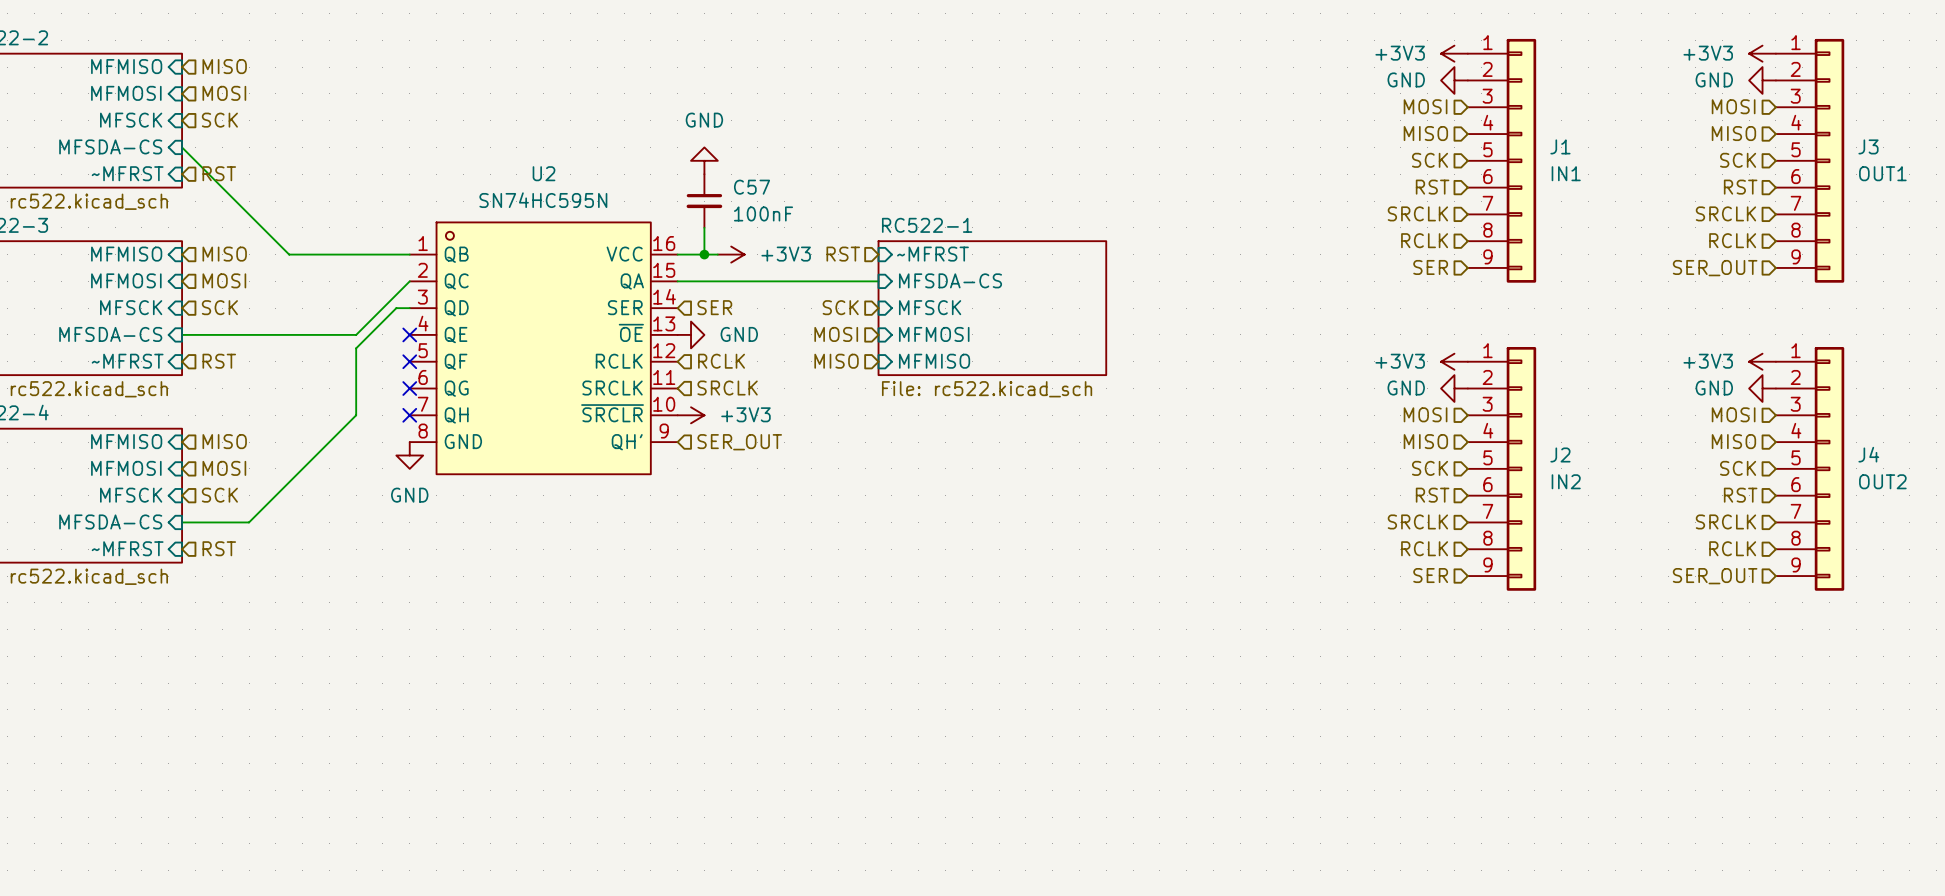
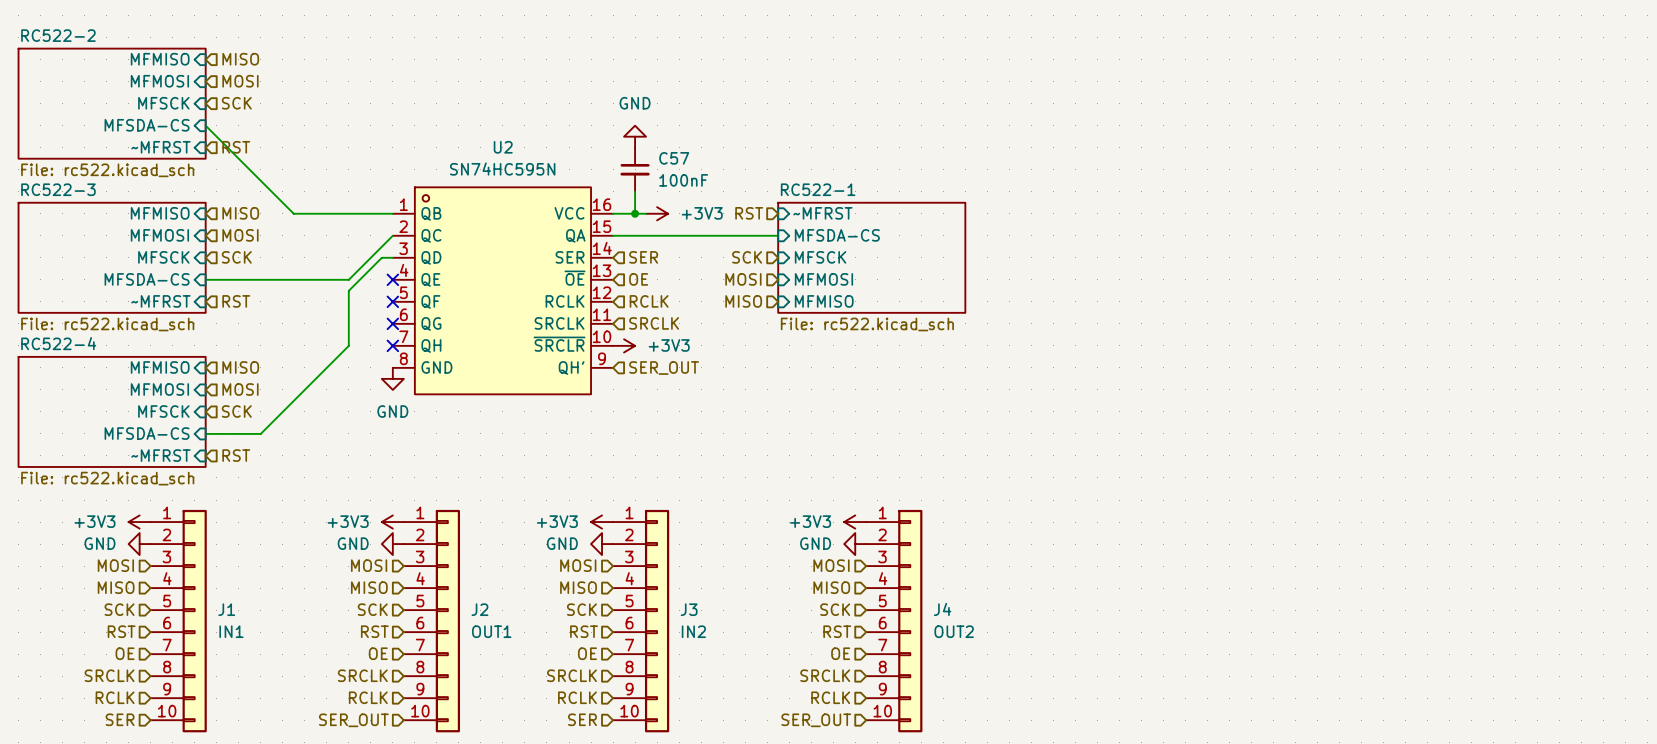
J1 symbol: [1467, 38, 1537, 283] -> [150, 509, 207, 733]
J3 symbol: [1775, 38, 1845, 283] -> [613, 509, 670, 733]
power symbol: +3V3 (1454, 53) -> none
power symbol: +3V3 (1762, 53) -> none
power symbol: GND (1454, 80) -> none
power symbol: GND (1762, 80) -> none
hierarchical label: MOSI (1425, 106) -> none
hierarchical label: MOSI (1733, 106) -> none
hierarchical label: MISO (1425, 133) -> none
hierarchical label: MISO (1733, 133) -> none
hierarchical label: SCK (1430, 160) -> none
hierarchical label: SCK (1738, 160) -> none
J3 value: OUT1 (1882, 173) -> IN2 (693, 631)
hierarchical label: RST (1432, 187) -> none
hierarchical label: RST (1740, 187) -> none
hierarchical label: SRCLK (1417, 213) -> none
hierarchical label: SRCLK (1725, 213) -> none
hierarchical label: RCLK (1424, 240) -> none
hierarchical label: RCLK (1732, 240) -> none
hierarchical label: SER (1430, 267) -> none
hierarchical label: SER_OUT (1715, 268) -> none
power symbol: GND (691, 334) -> none
hierarchical label: none -> OE (638, 279)
J2 symbol: [1467, 346, 1537, 591] -> [403, 509, 461, 733]
J4 symbol: [1775, 346, 1845, 591] -> [866, 509, 923, 733]
power symbol: +3V3 (1454, 361) -> none
power symbol: +3V3 (1762, 361) -> none
power symbol: GND (1454, 388) -> none
power symbol: GND (1762, 388) -> none
hierarchical label: MOSI (1425, 414) -> none
hierarchical label: MOSI (1733, 414) -> none
hierarchical label: MISO (1425, 441) -> none
hierarchical label: MISO (1733, 441) -> none
hierarchical label: SCK (1430, 468) -> none
hierarchical label: SCK (1738, 468) -> none
J2 value: IN2 (1566, 481) -> OUT1 (491, 631)
hierarchical label: RST (1432, 495) -> none
hierarchical label: RST (1740, 495) -> none
hierarchical label: SRCLK (1417, 521) -> none
hierarchical label: SRCLK (1725, 521) -> none
hierarchical label: RCLK (1424, 548) -> none
hierarchical label: RCLK (1732, 548) -> none
hierarchical label: SER (1430, 575) -> none
hierarchical label: SER_OUT (1715, 576) -> none
power symbol: none -> +3V3 (139, 522)
power symbol: none -> +3V3 (392, 522)
power symbol: none -> +3V3 (602, 522)
power symbol: none -> +3V3 (855, 522)
power symbol: none -> GND (139, 544)
power symbol: none -> GND (392, 544)
power symbol: none -> GND (602, 544)
power symbol: none -> GND (855, 544)
hierarchical label: none -> MOSI (115, 565)
hierarchical label: none -> MOSI (369, 565)
hierarchical label: none -> MOSI (578, 565)
hierarchical label: none -> MOSI (831, 565)
hierarchical label: none -> MISO (116, 587)
hierarchical label: none -> MISO (369, 587)
hierarchical label: none -> MISO (578, 587)
hierarchical label: none -> MISO (831, 587)
hierarchical label: none -> SCK (119, 609)
hierarchical label: none -> SCK (372, 609)
hierarchical label: none -> SCK (581, 609)
hierarchical label: none -> SCK (835, 609)
hierarchical label: none -> RST (121, 631)
hierarchical label: none -> RST (374, 631)
hierarchical label: none -> RST (584, 631)
hierarchical label: none -> RST (837, 631)
hierarchical label: none -> OE (125, 653)
hierarchical label: none -> OE (378, 653)
hierarchical label: none -> OE (587, 653)
hierarchical label: none -> OE (840, 653)
hierarchical label: none -> SRCLK (109, 675)
hierarchical label: none -> SRCLK (362, 675)
hierarchical label: none -> SRCLK (571, 675)
hierarchical label: none -> SRCLK (825, 675)
hierarchical label: none -> RCLK (115, 697)
hierarchical label: none -> RCLK (368, 697)
hierarchical label: none -> RCLK (577, 697)
hierarchical label: none -> RCLK (830, 697)
hierarchical label: none -> SER (120, 719)
hierarchical label: none -> SER_OUT (353, 720)
hierarchical label: none -> SER (582, 719)
hierarchical label: none -> SER_OUT (816, 720)

